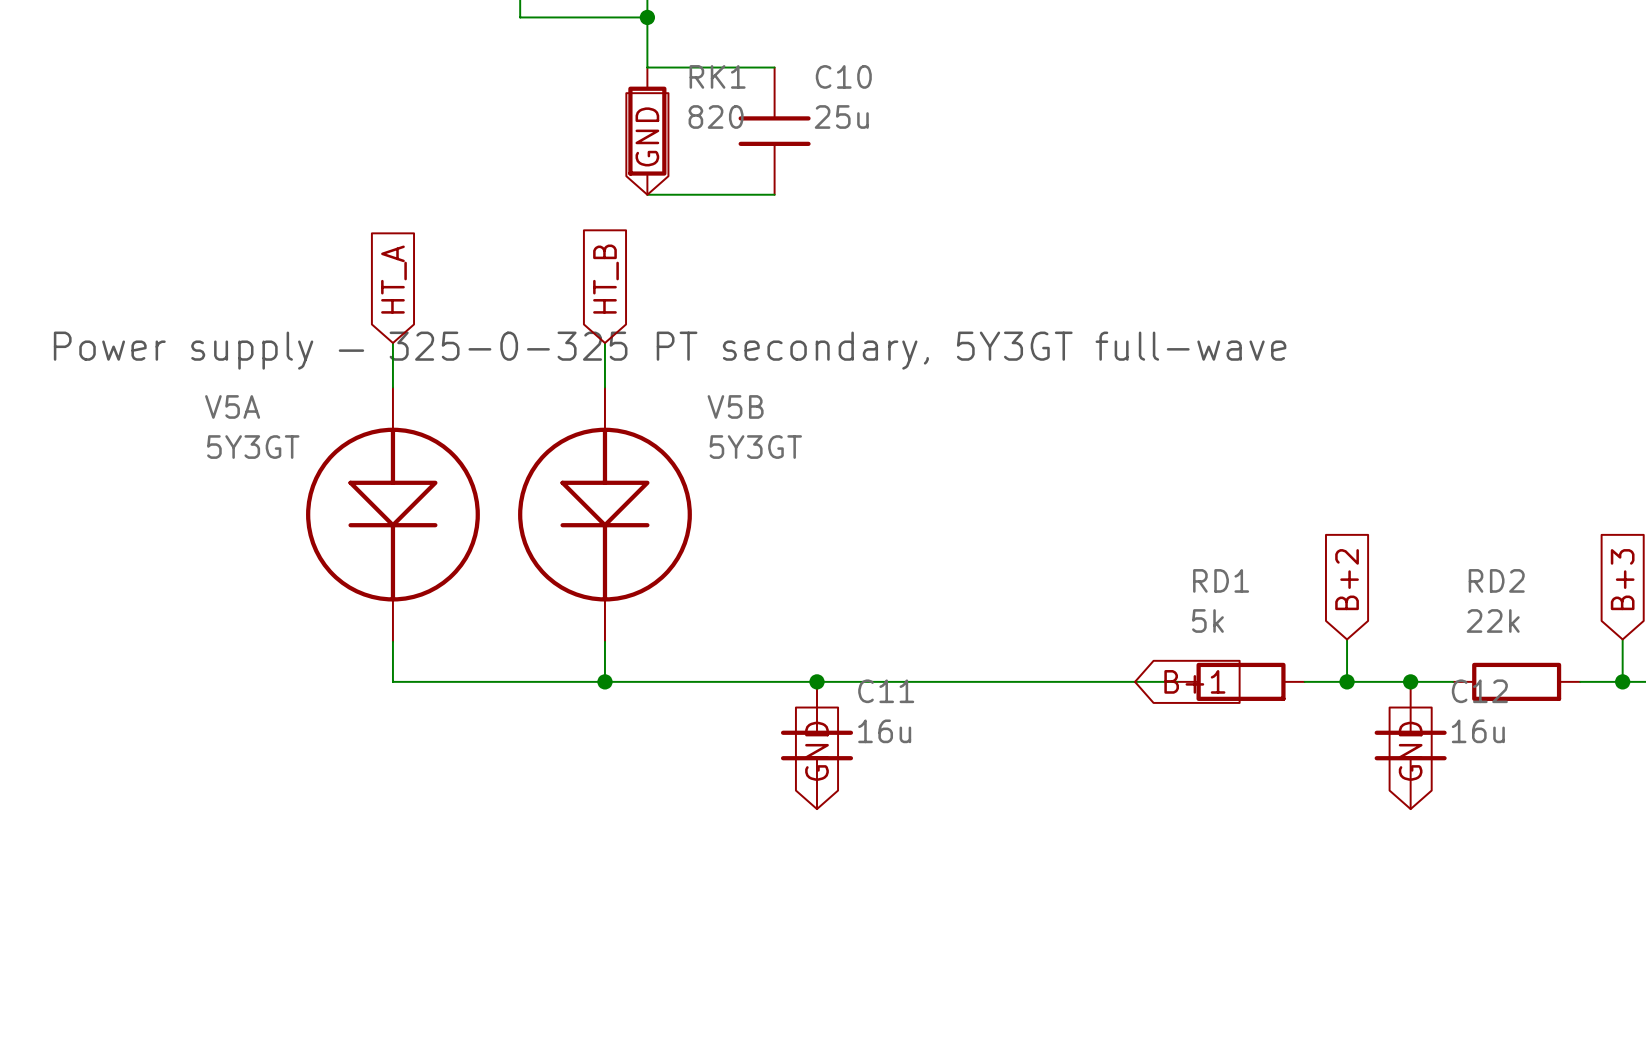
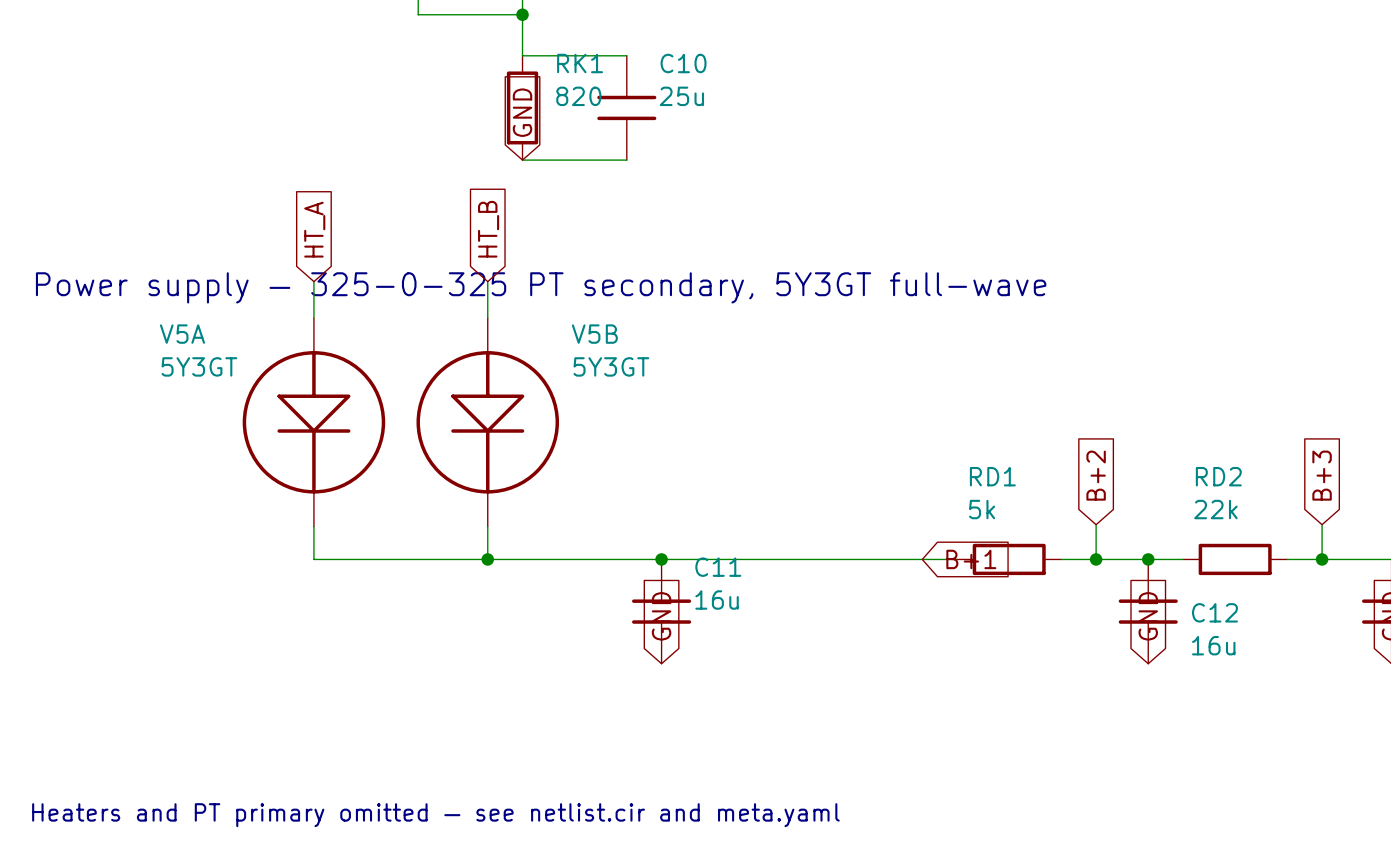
C12 name position: C12 (1479, 691) -> C12 (1214, 612)
C12 value position: 16u (1478, 731) -> 16u (1213, 645)
text: none -> Heaters and PT primary omitted — see netlist.cir and meta.yaml (435, 815)

